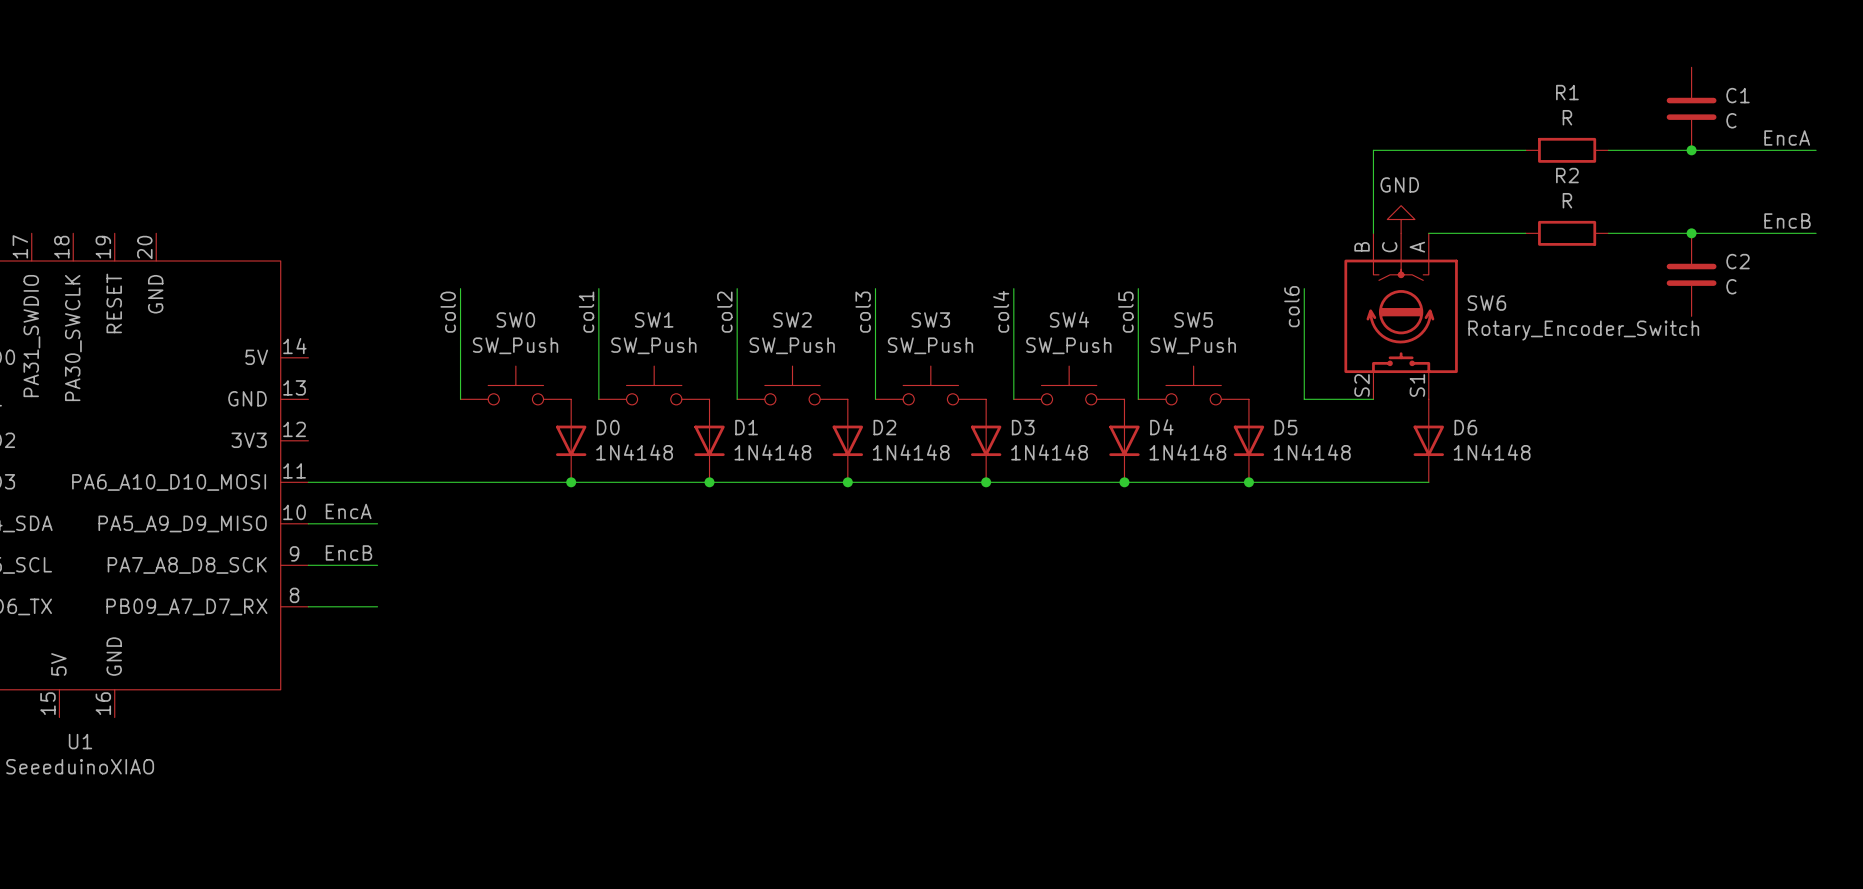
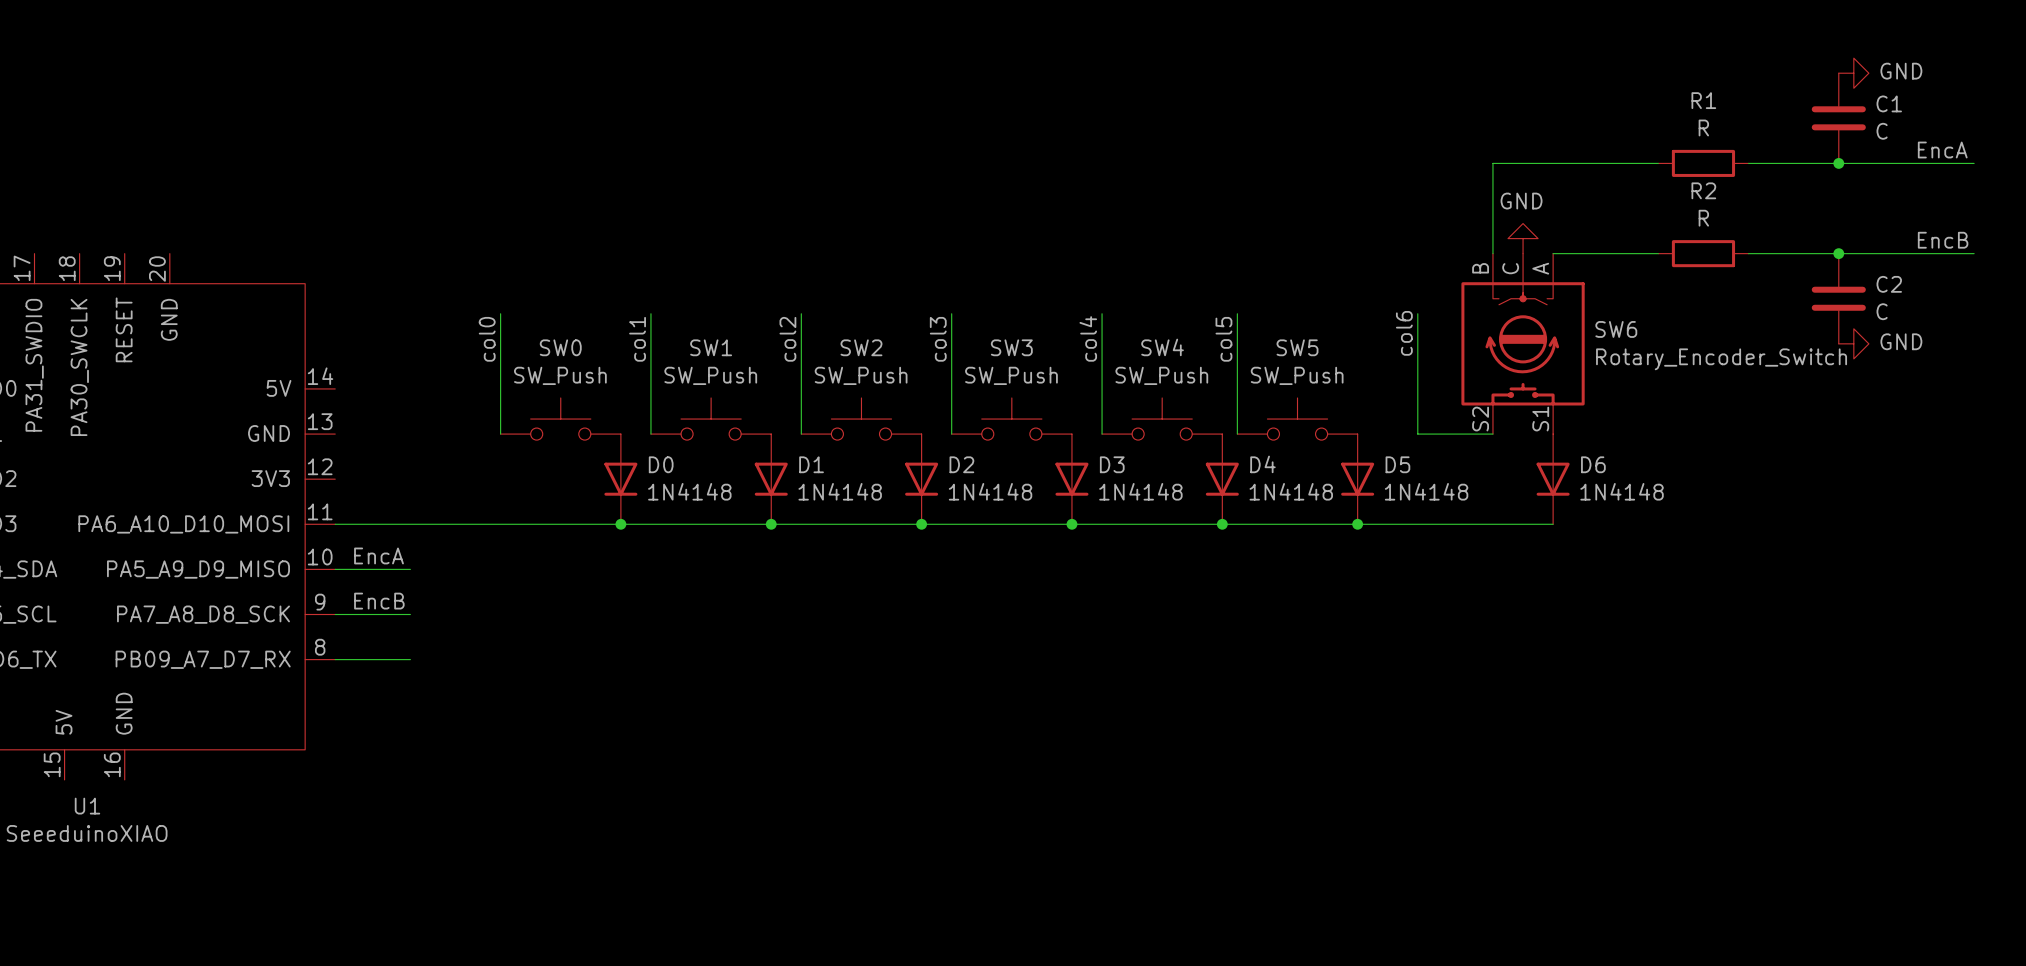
power symbol: none -> GND (1853, 73)
power symbol: none -> GND (1853, 343)

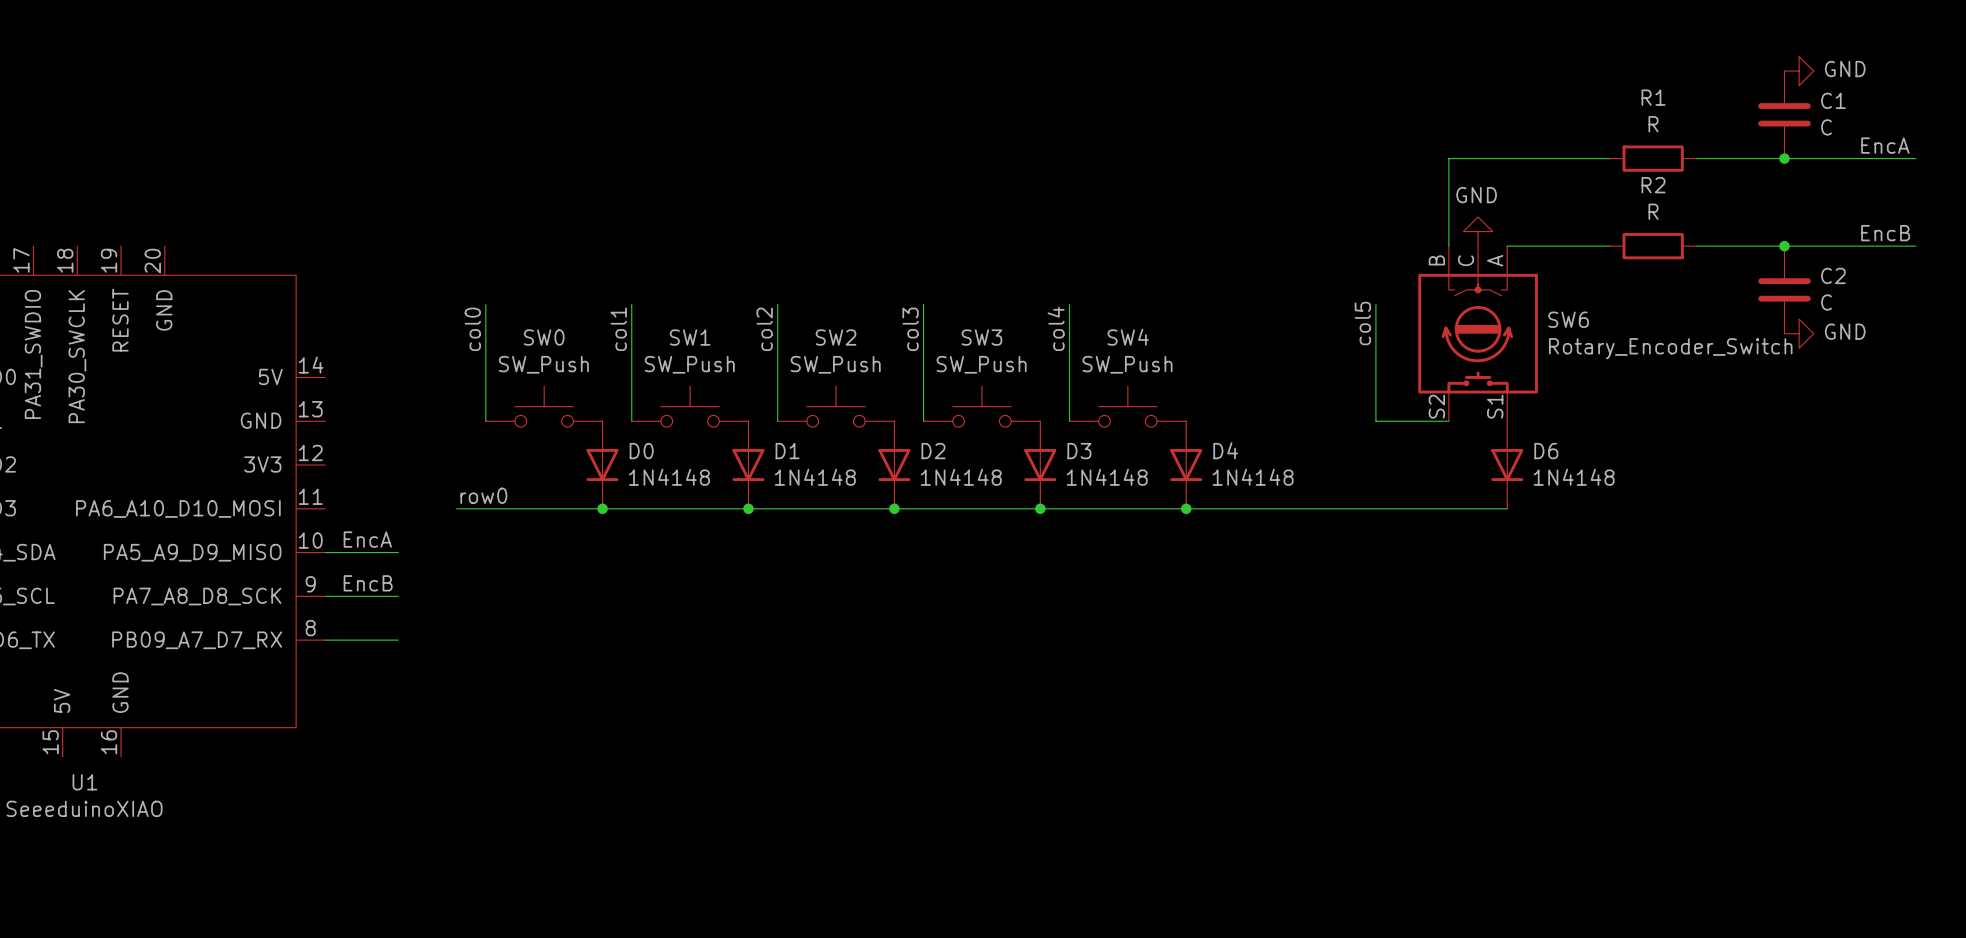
wire: (1237, 313) (1237, 434) -> none
label: col6 (1404, 333) -> col5 (1362, 323)
label: col5 (1223, 339) -> none
SW5: SW_Push (1297, 419) -> none
D5: 1N4148 (1357, 479) -> none
label: none -> row0 (483, 495)
wire: (335, 524) (470, 524) -> none
junction: (1357, 524) -> none

